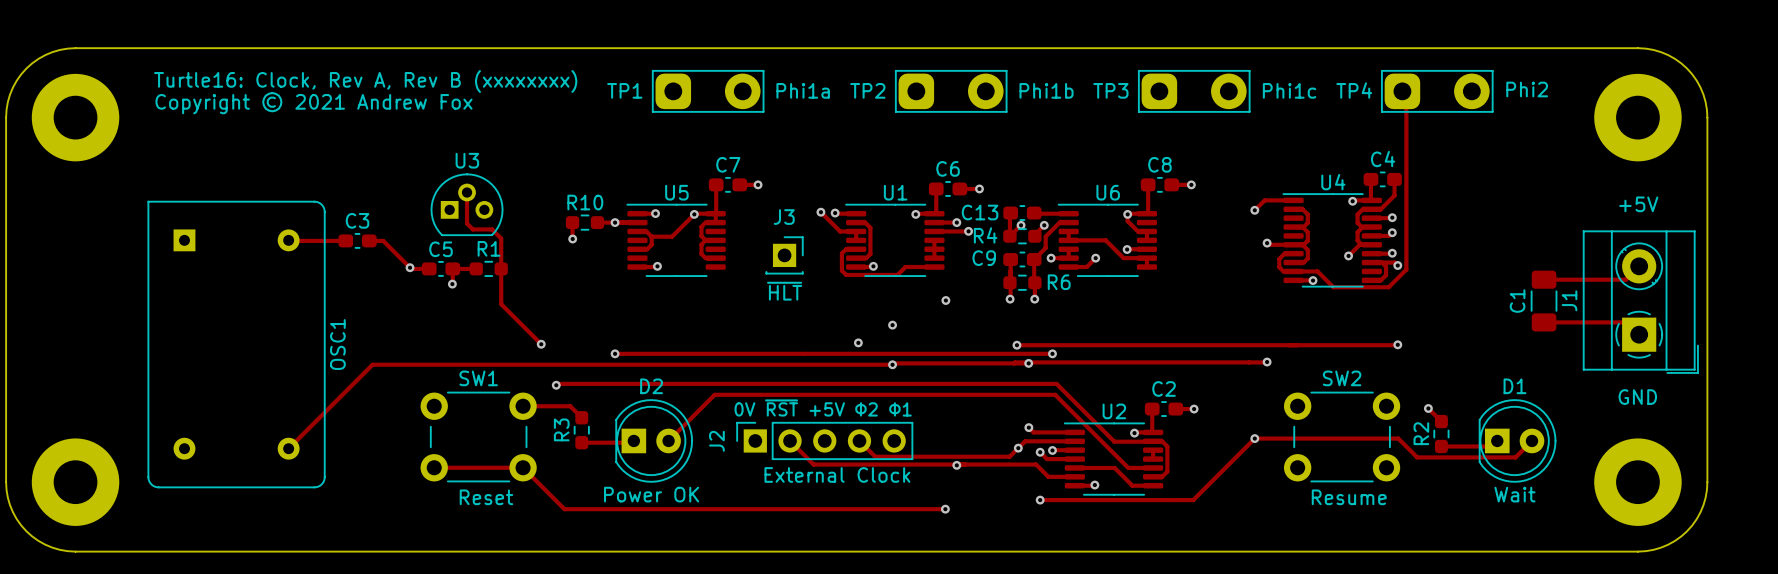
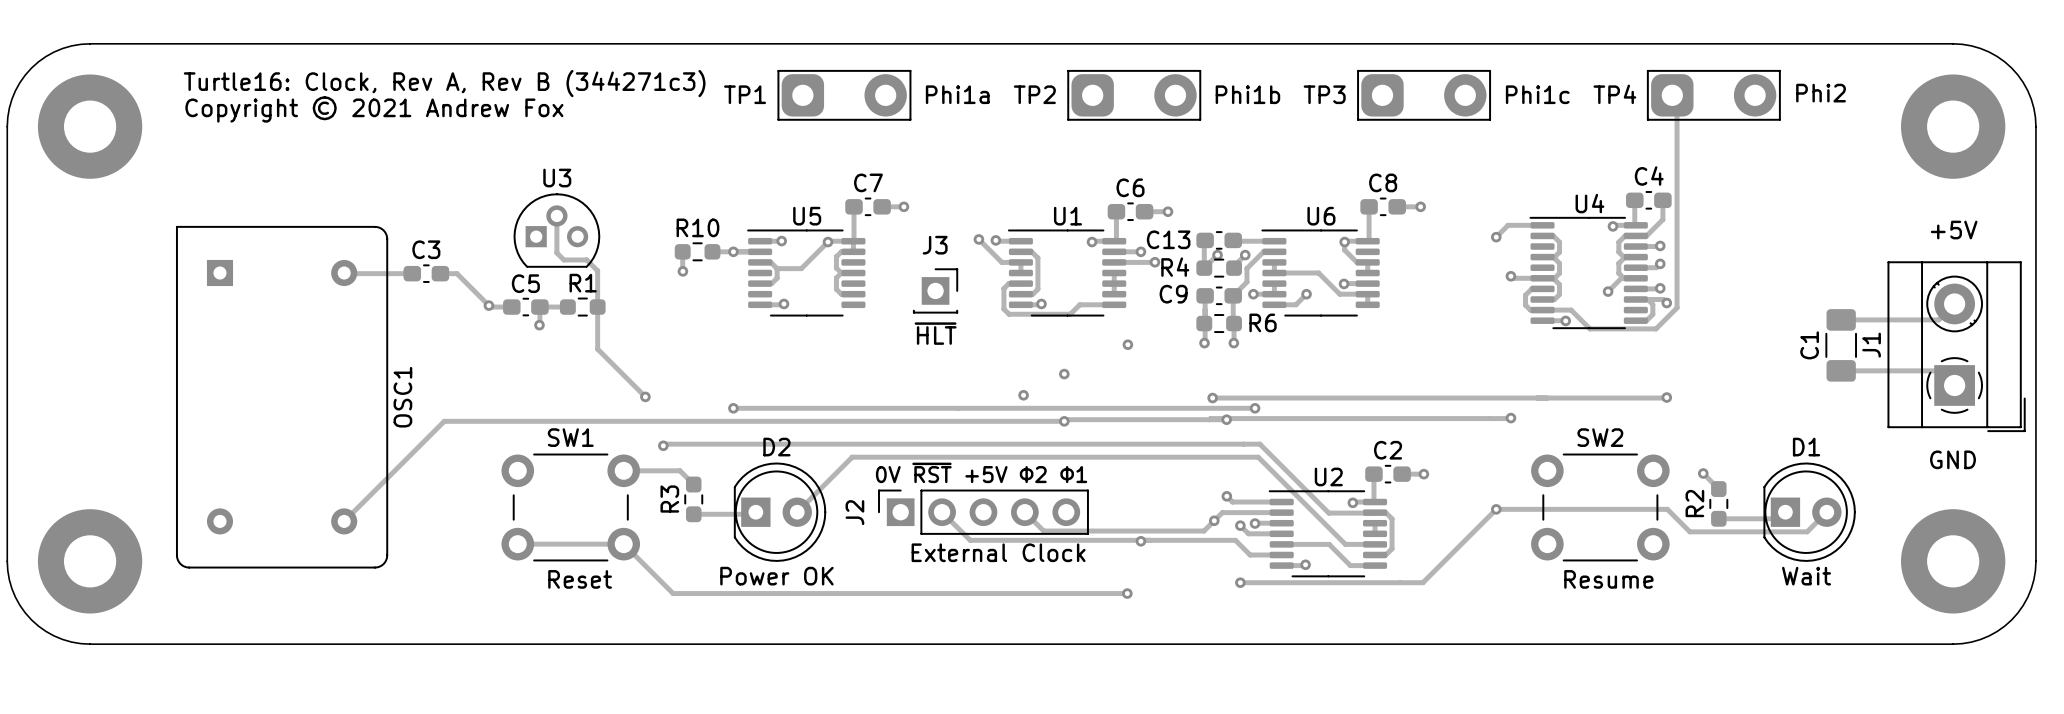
text: Turtle16: Clock, Rev A, Rev B (xxxxxxxx) (365, 81) -> Turtle16: Clock, Rev A, Rev B (344271c3) (444, 83)

